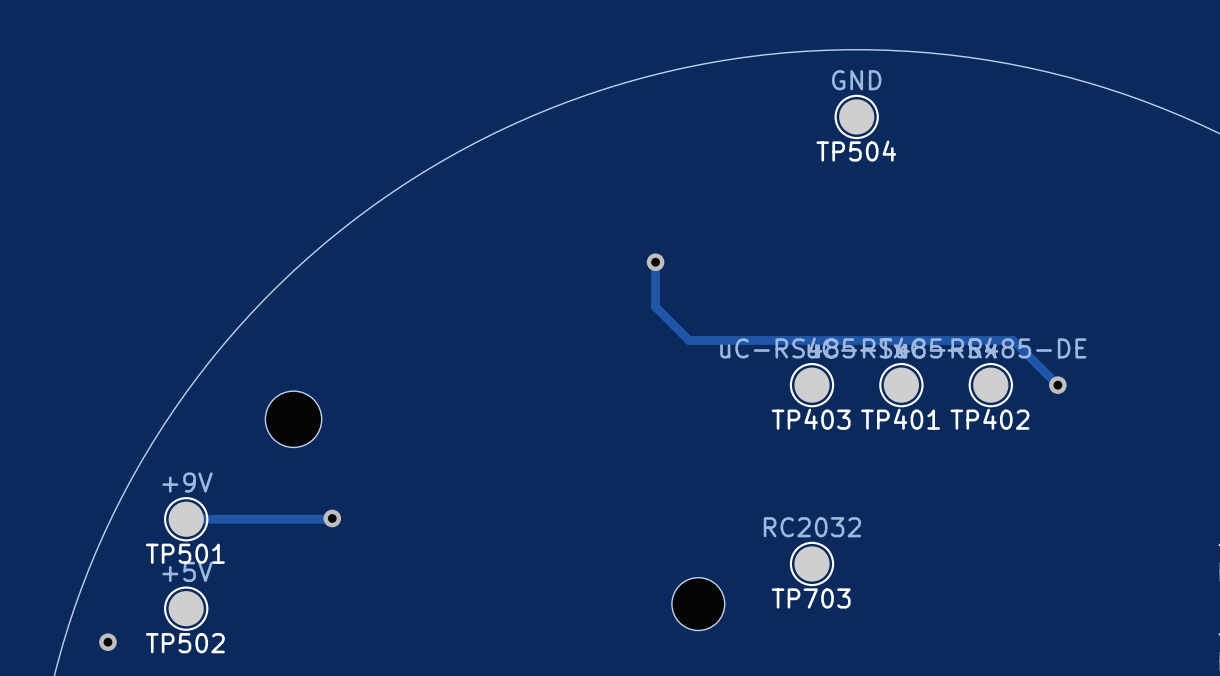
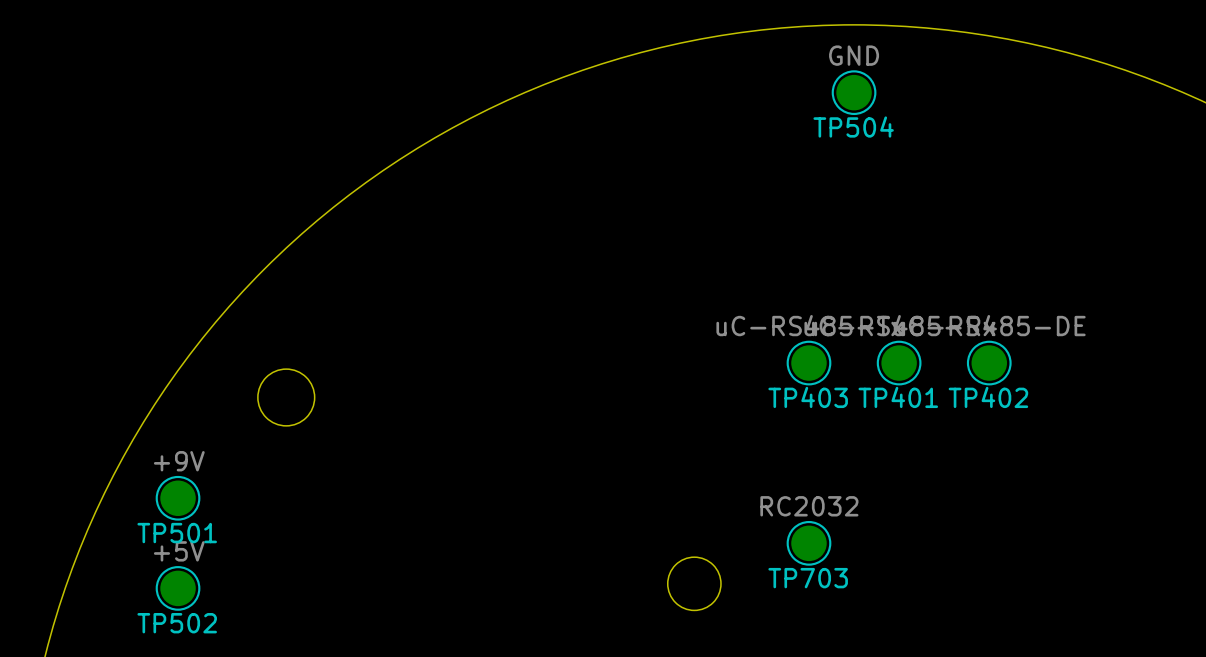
track: (655, 262) (655, 306) (689, 340) (1013, 340) (1057, 385) -> none
via: (655, 262) -> none
via: (1057, 385) -> none
track: (332, 518) (186, 519) -> none
via: (332, 518) -> none
via: (107, 642) -> none

